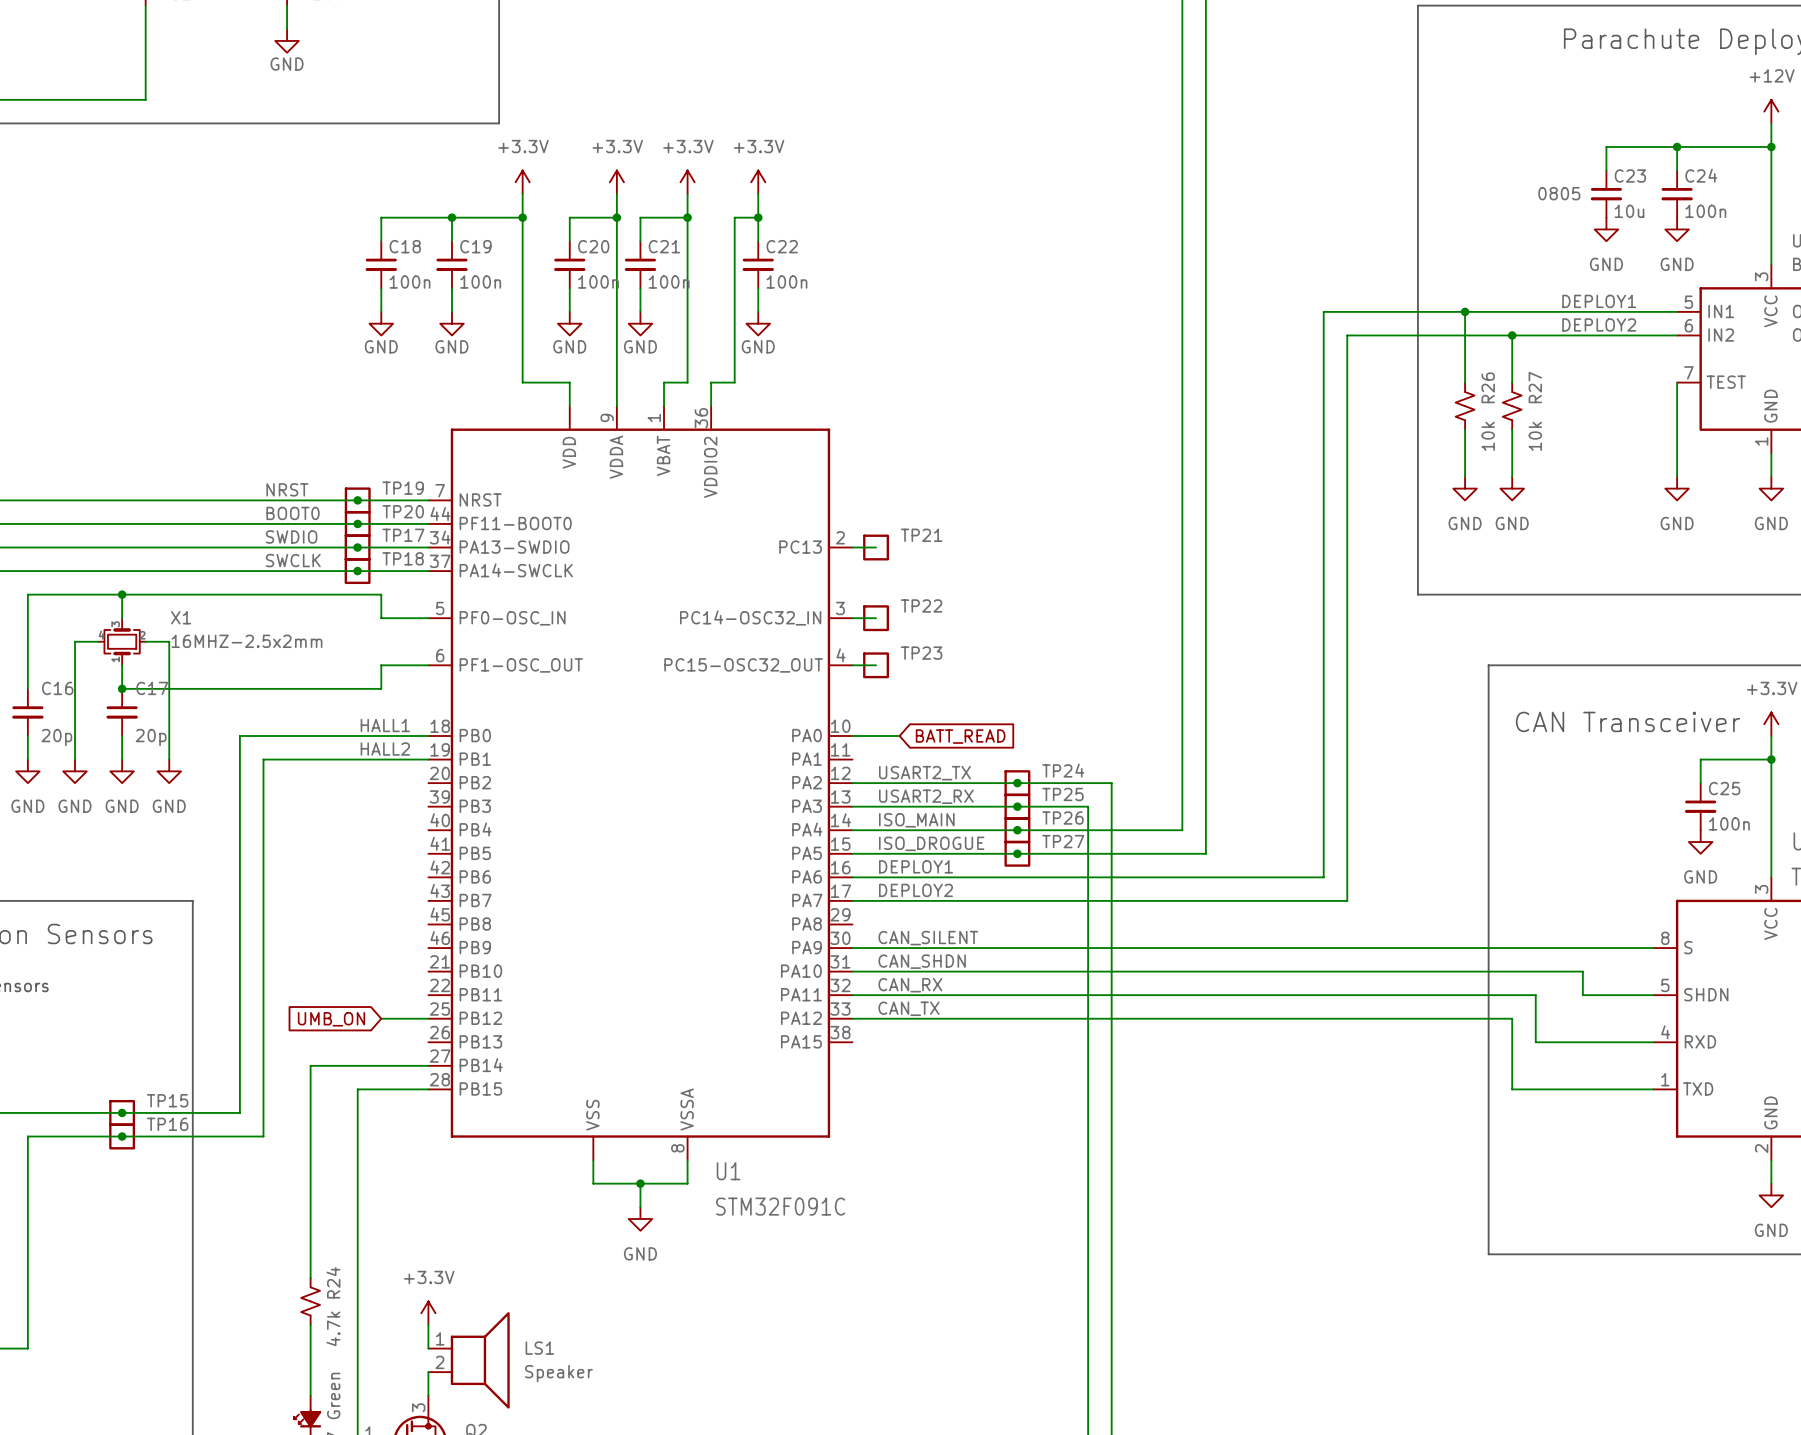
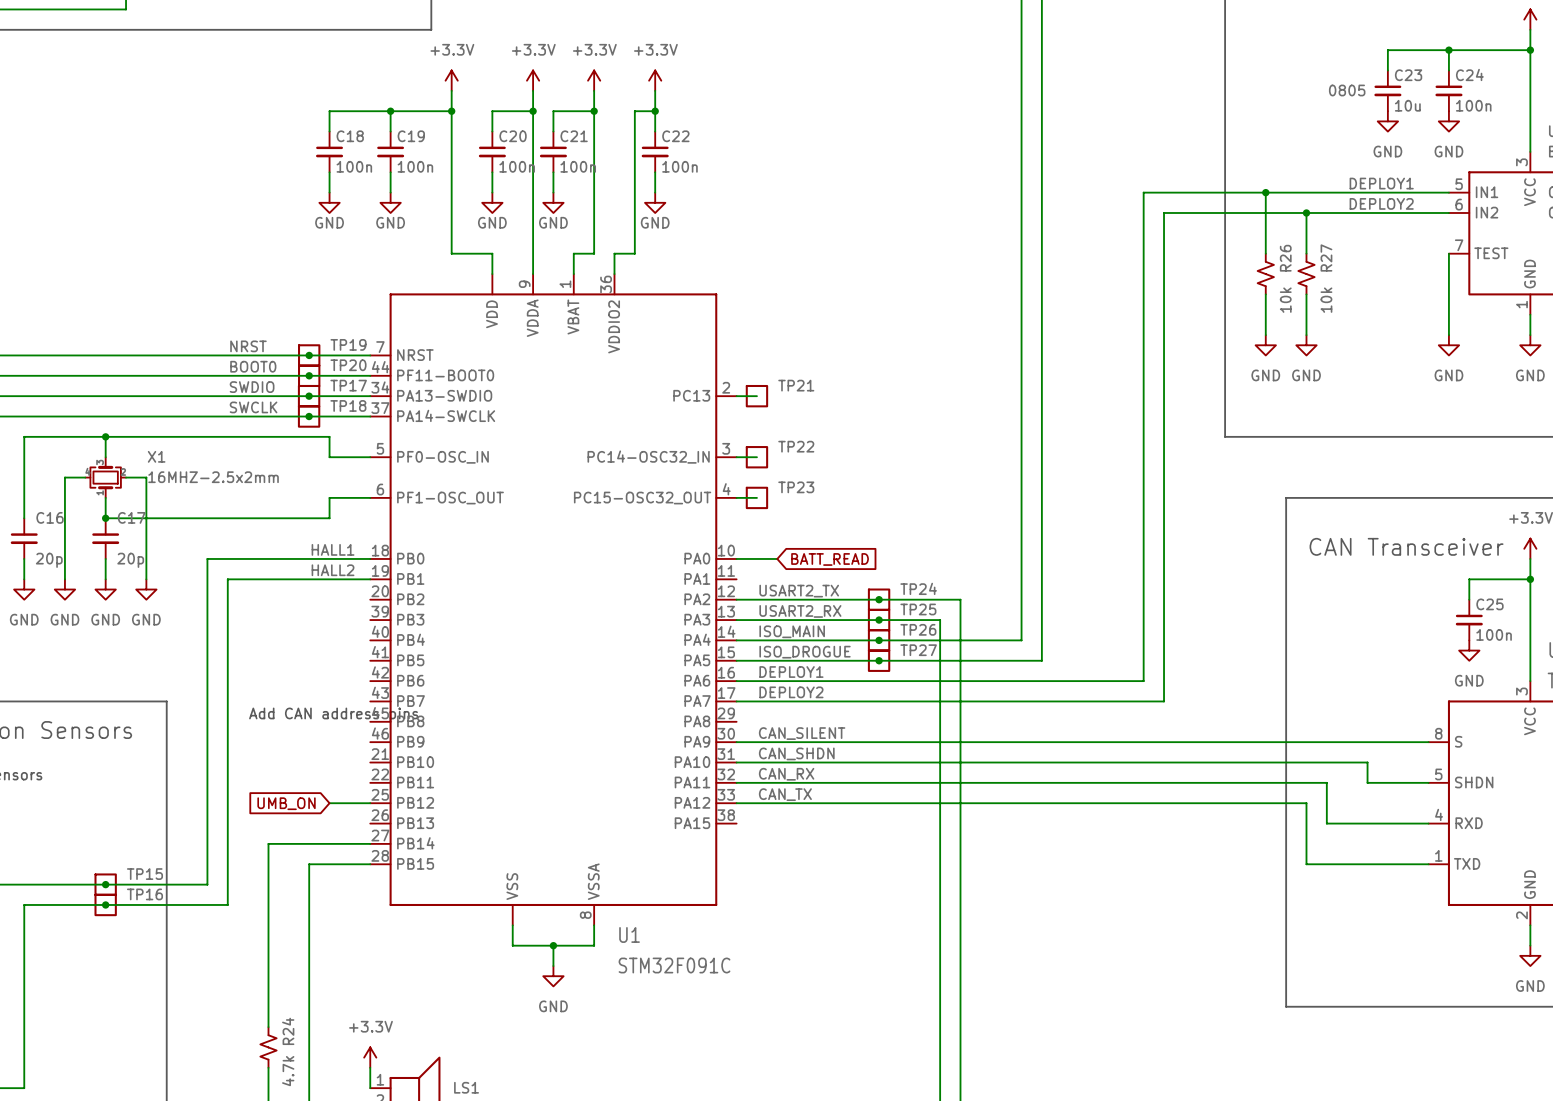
text: none -> Add CAN address pins (333, 715)

